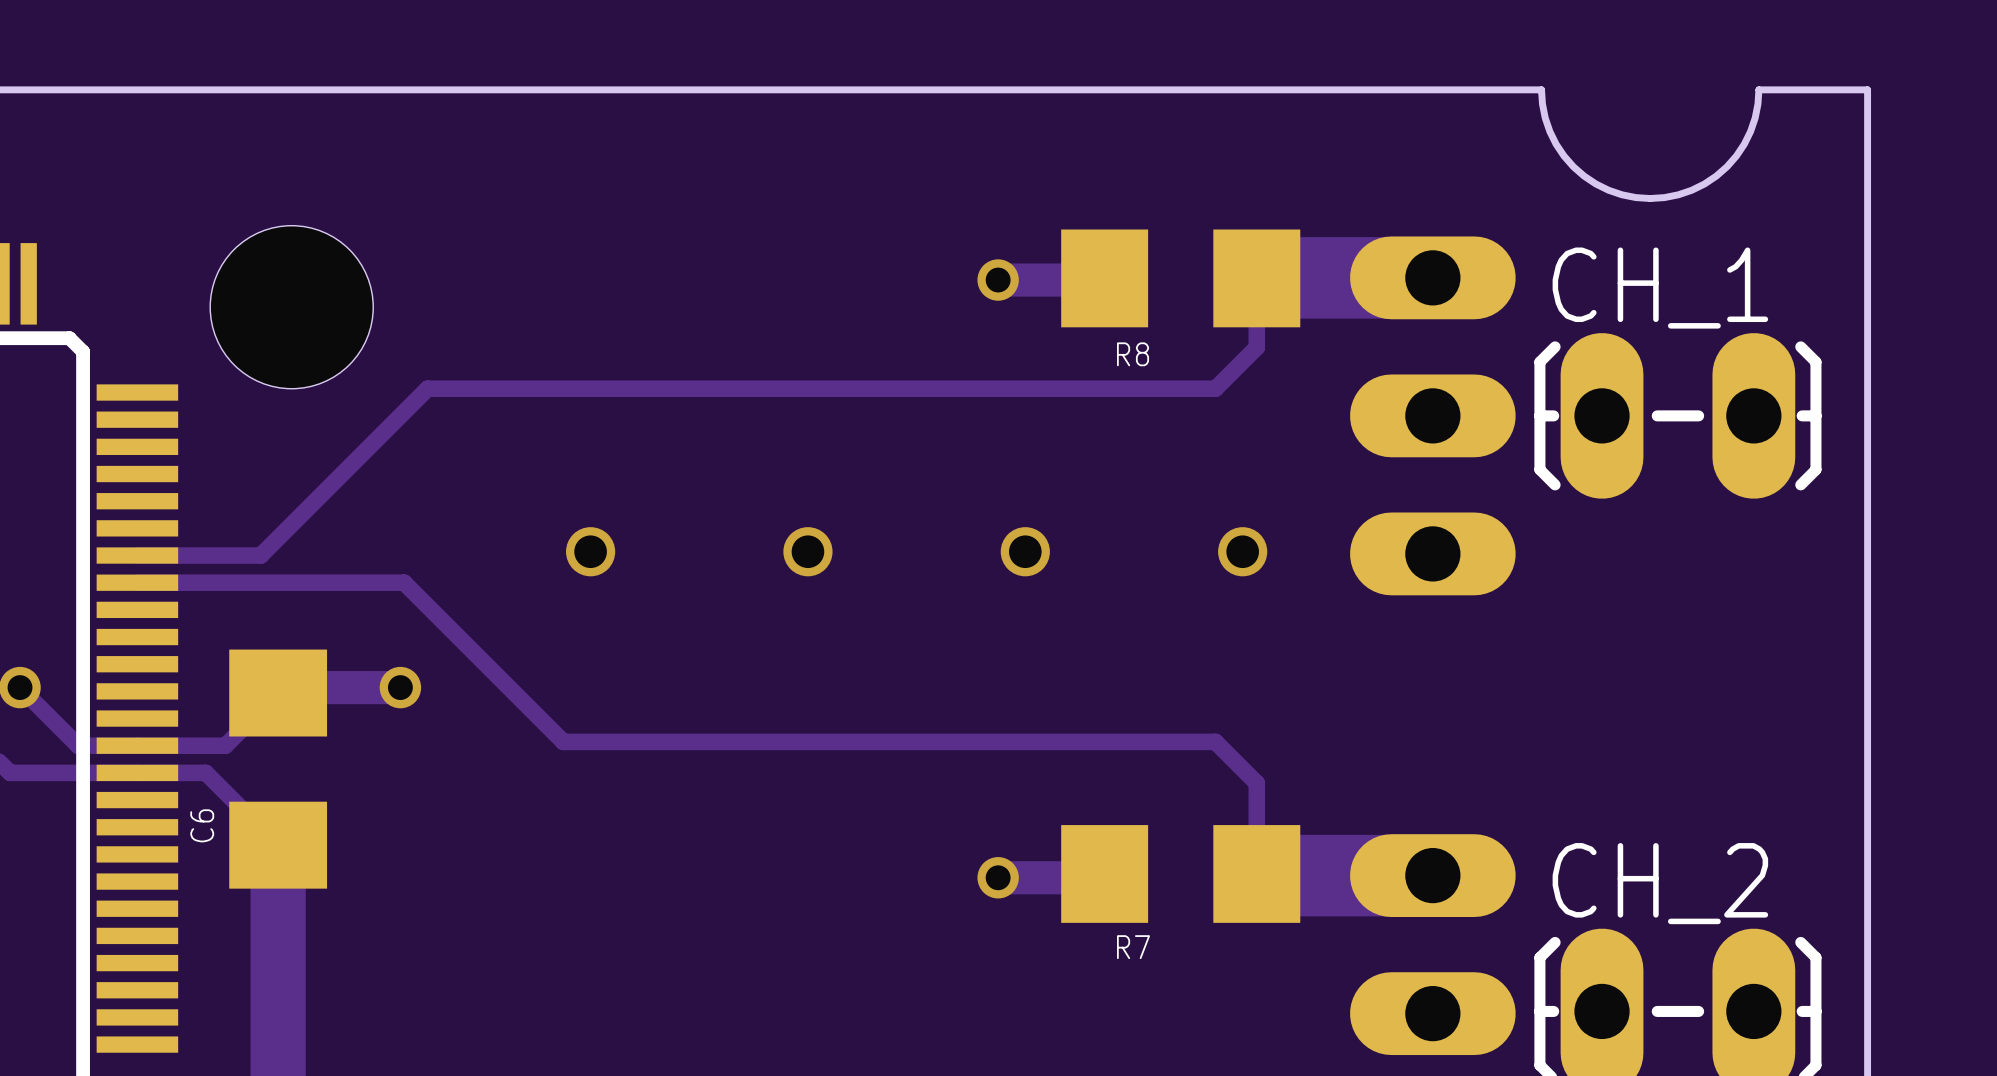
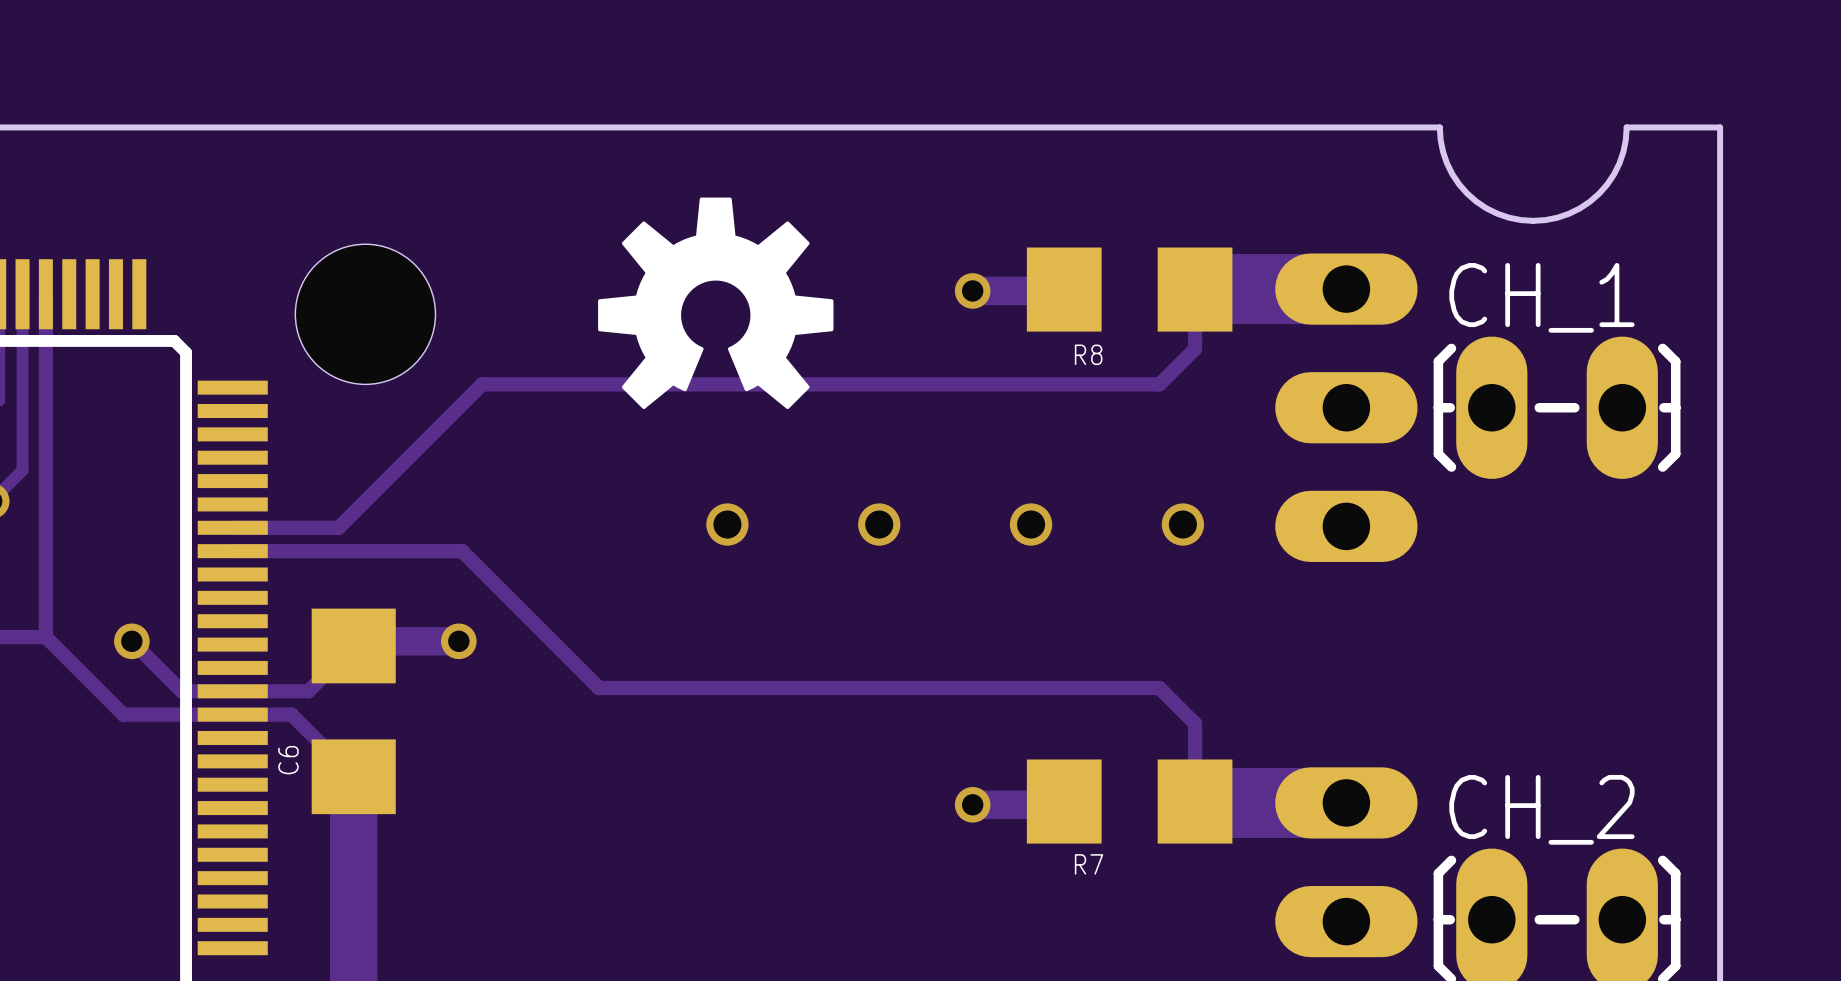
drawing: none -> [598, 197, 834, 410]
via: (590, 551) -> none
via: none -> (727, 524)
via: (807, 551) -> none
via: none -> (879, 524)
via position: (1025, 551) -> (1031, 524)

